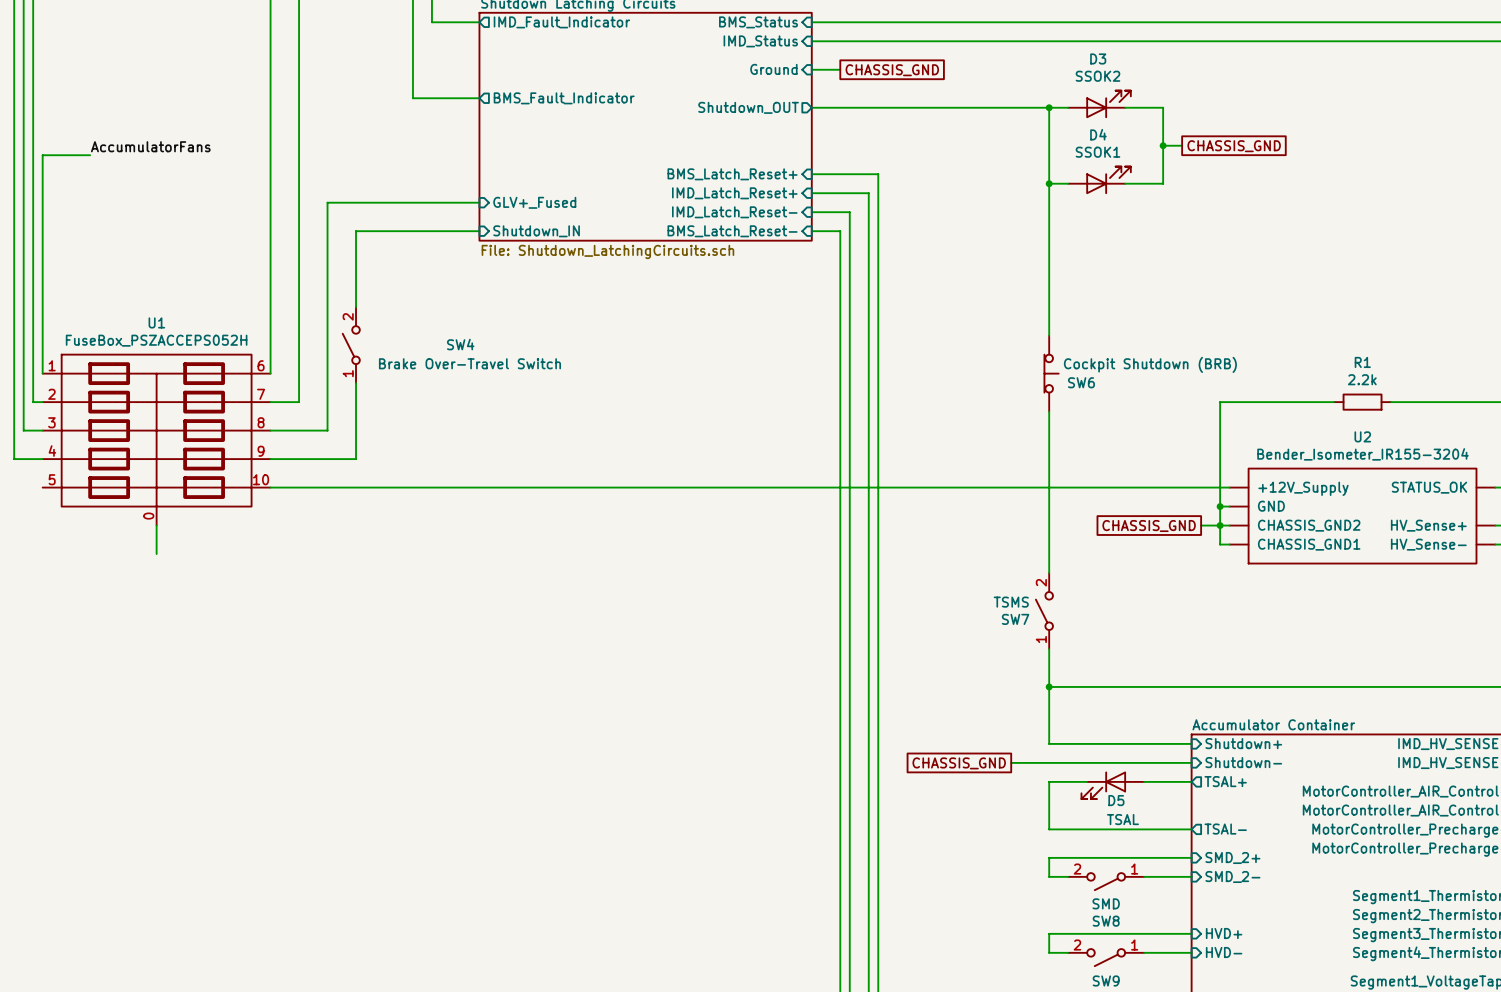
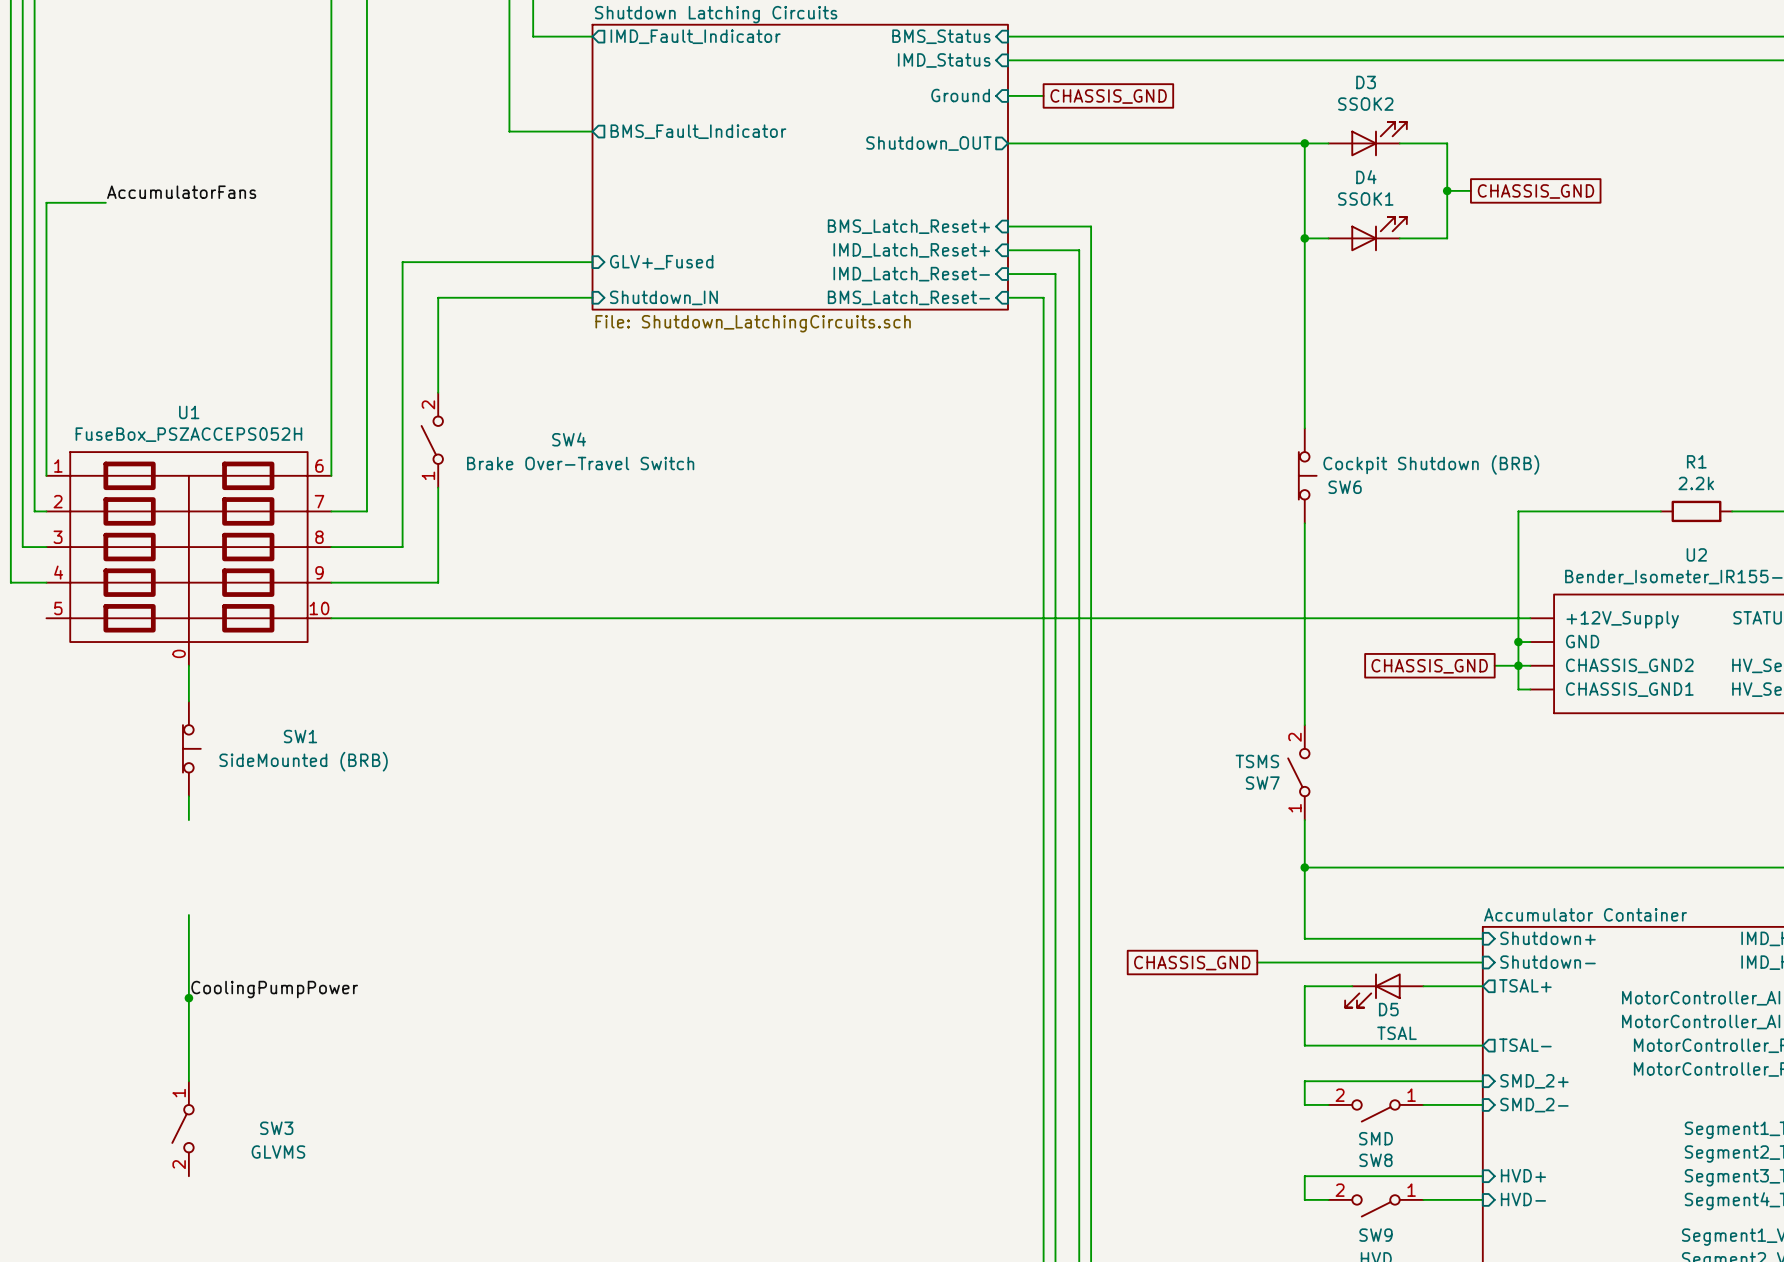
SW1: none -> SideMounted (BRB) (191, 748)
wire: none -> (188, 796) (188, 820)
wire: none -> (188, 915) (188, 1081)
label: none -> CoolingPumpPower (274, 989)
junction: none -> (188, 998)
SW3: none -> GLVMS (182, 1128)

